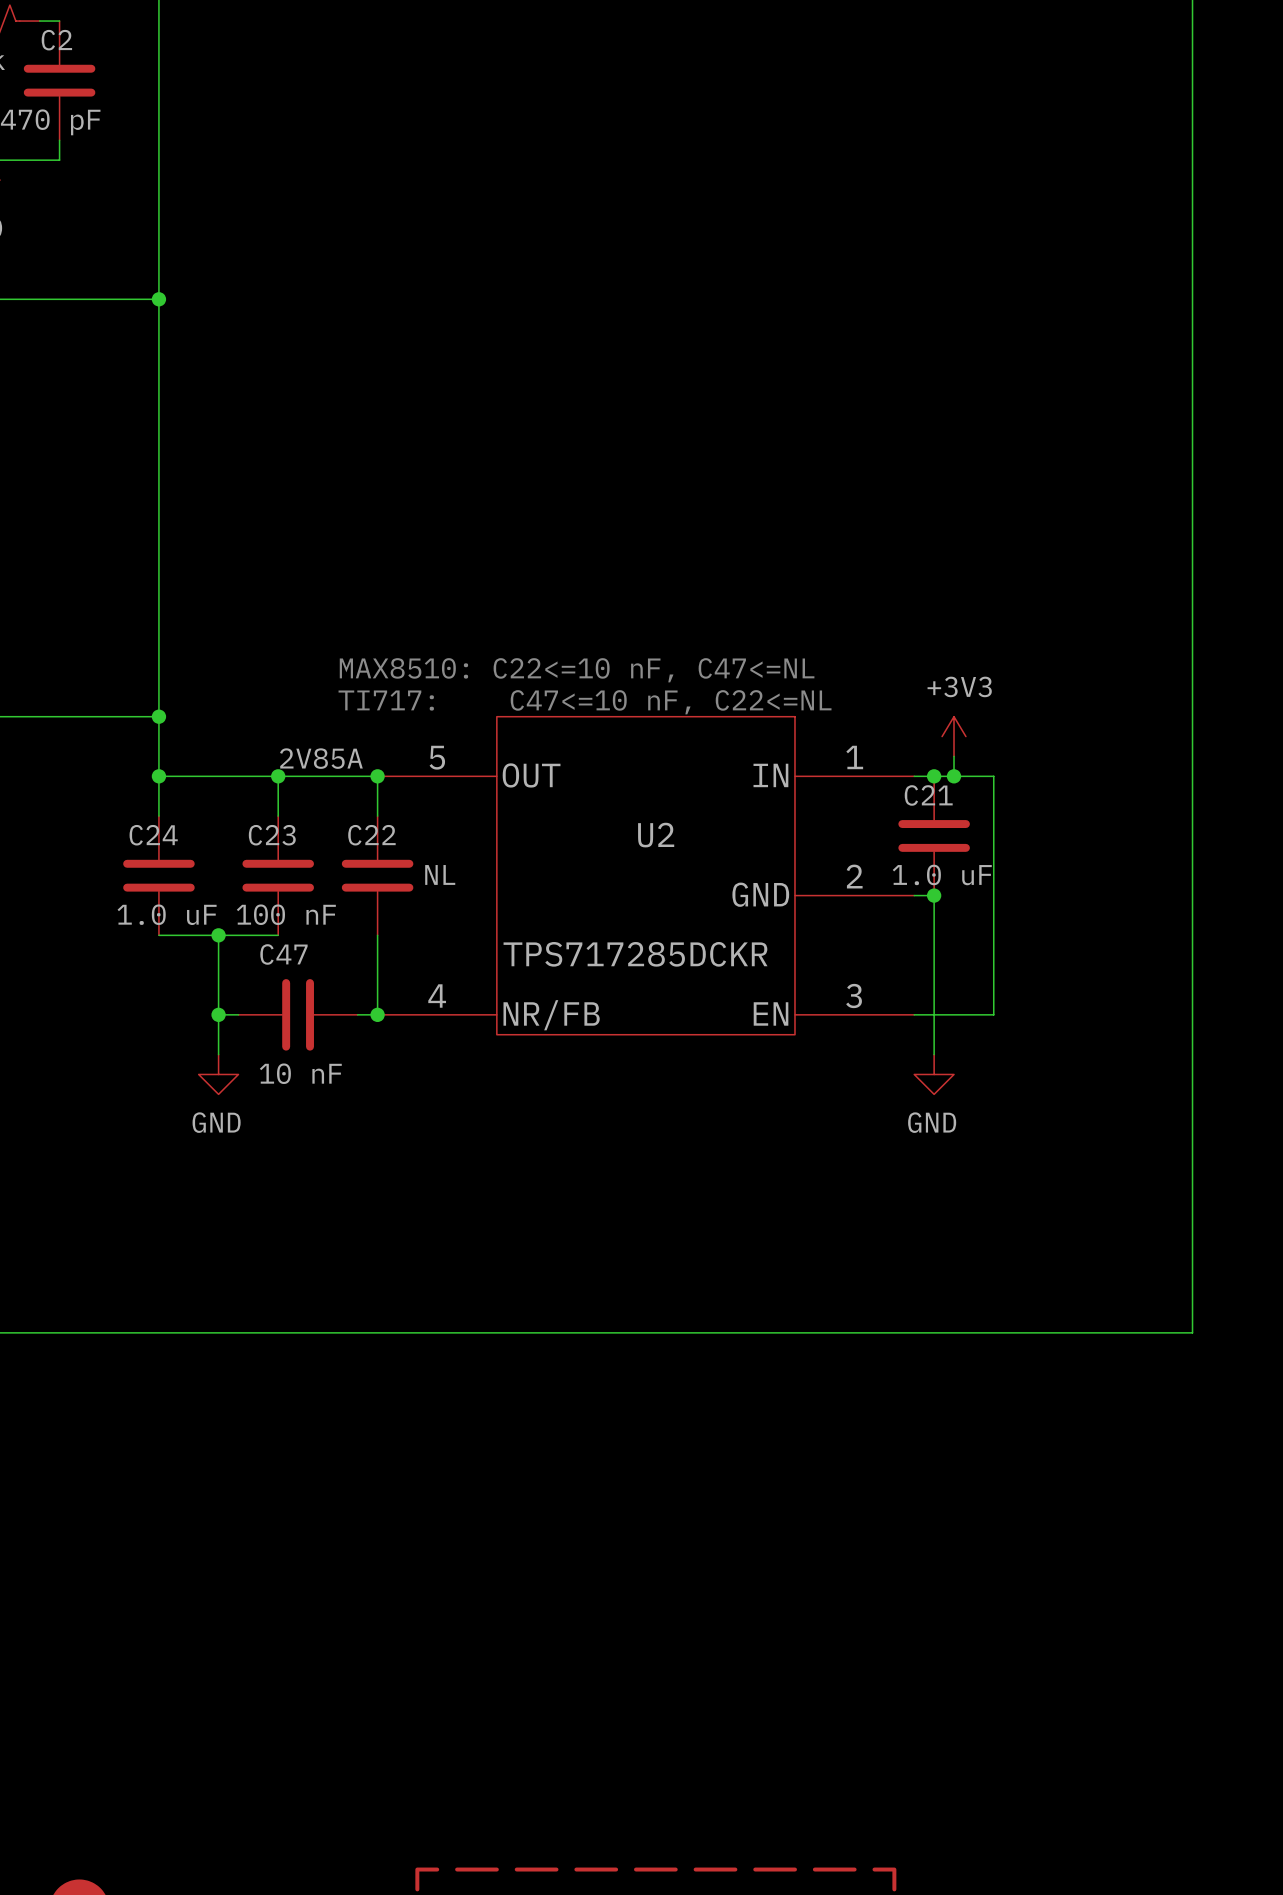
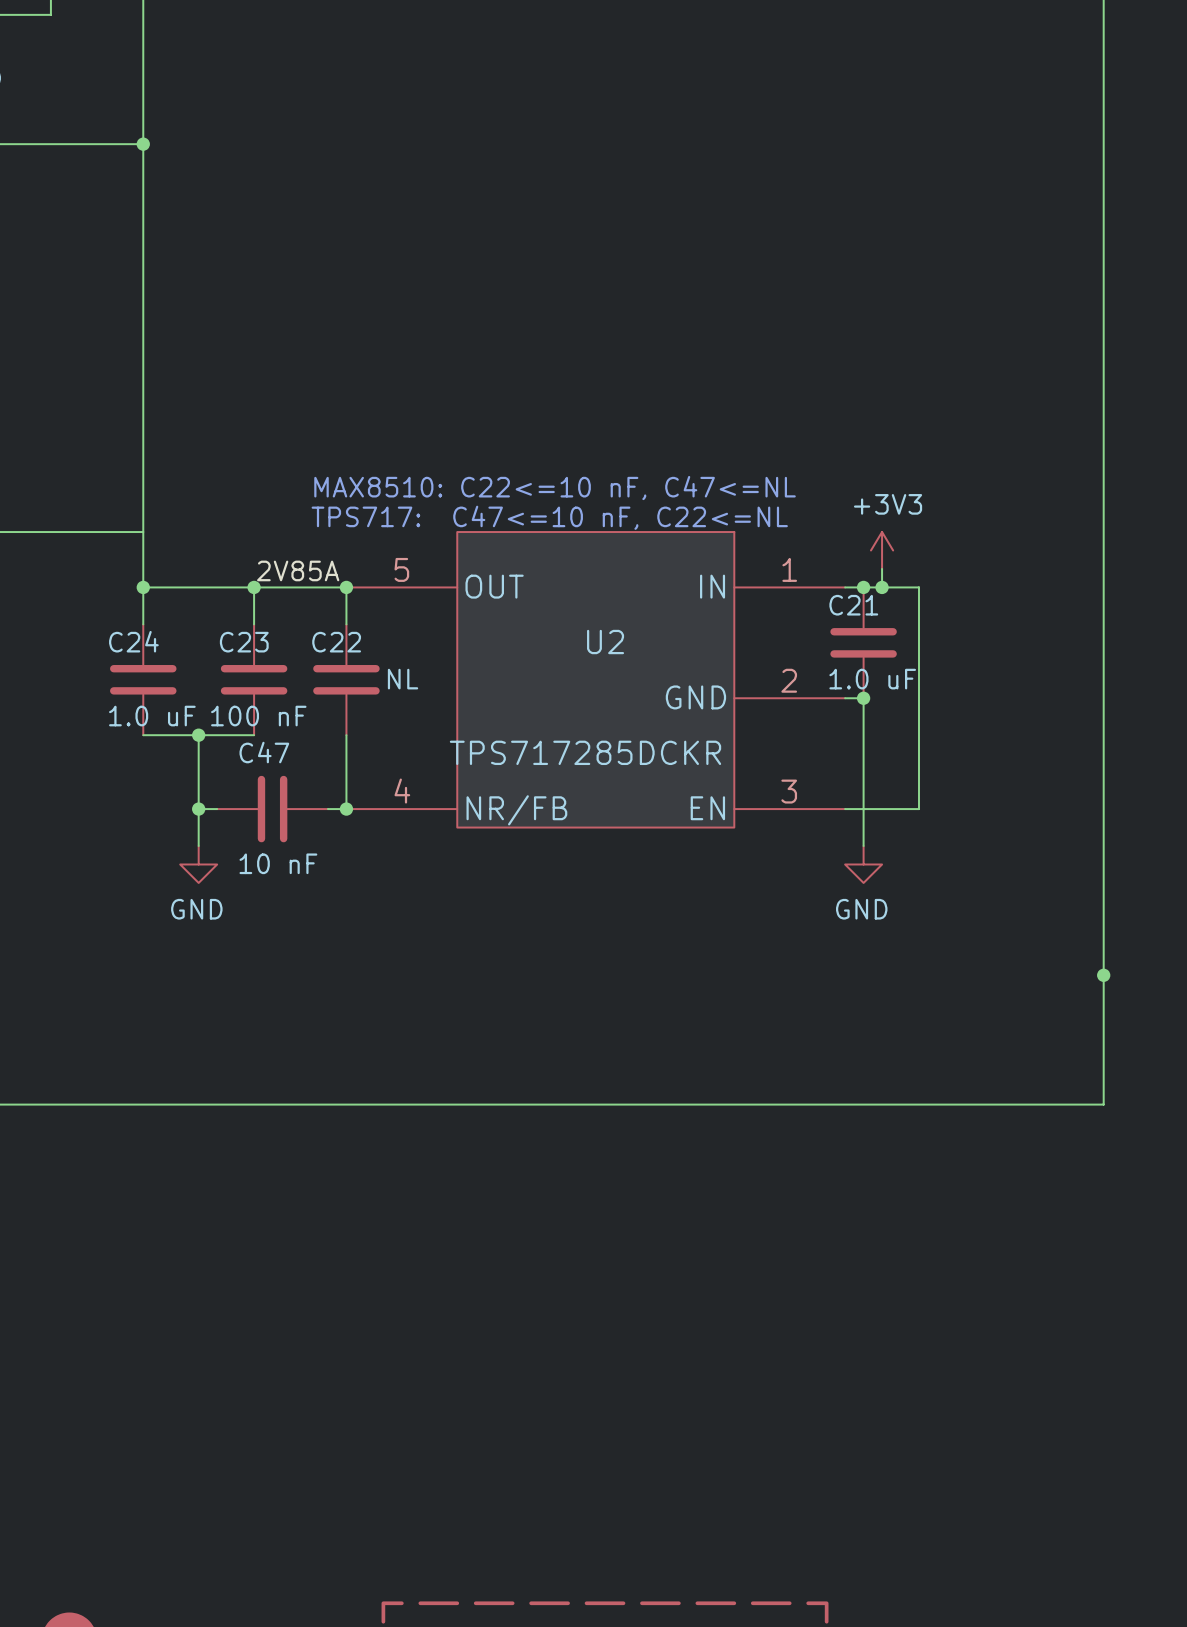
text: TI717: C47<=10 nF, C22<=NL (585, 702) -> TPS717: C47<=10 nF, C22<=NL (549, 517)
junction: (158, 716) -> none
junction: none -> (1103, 975)

